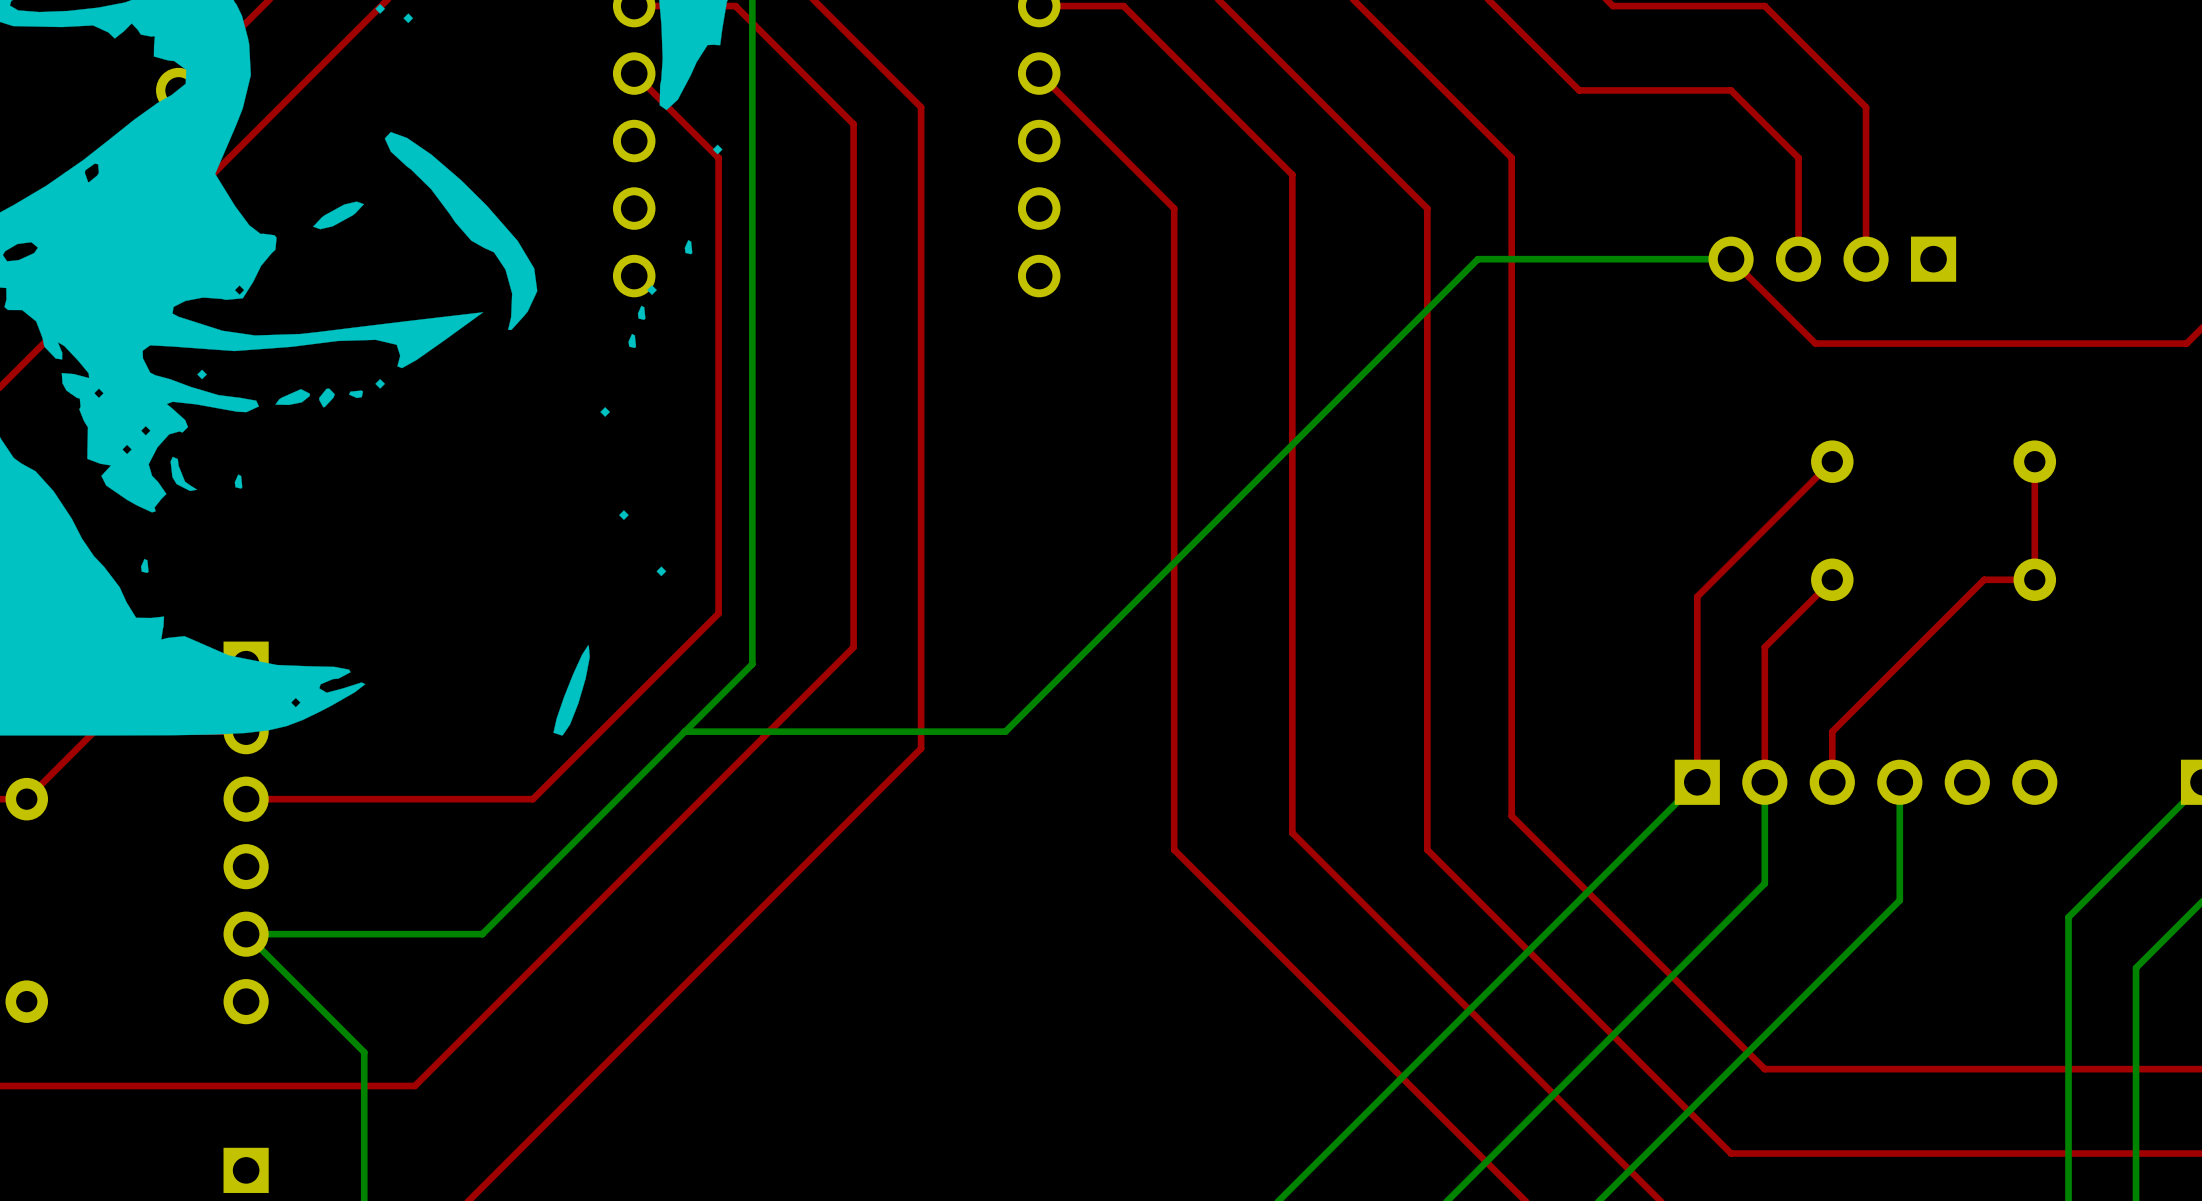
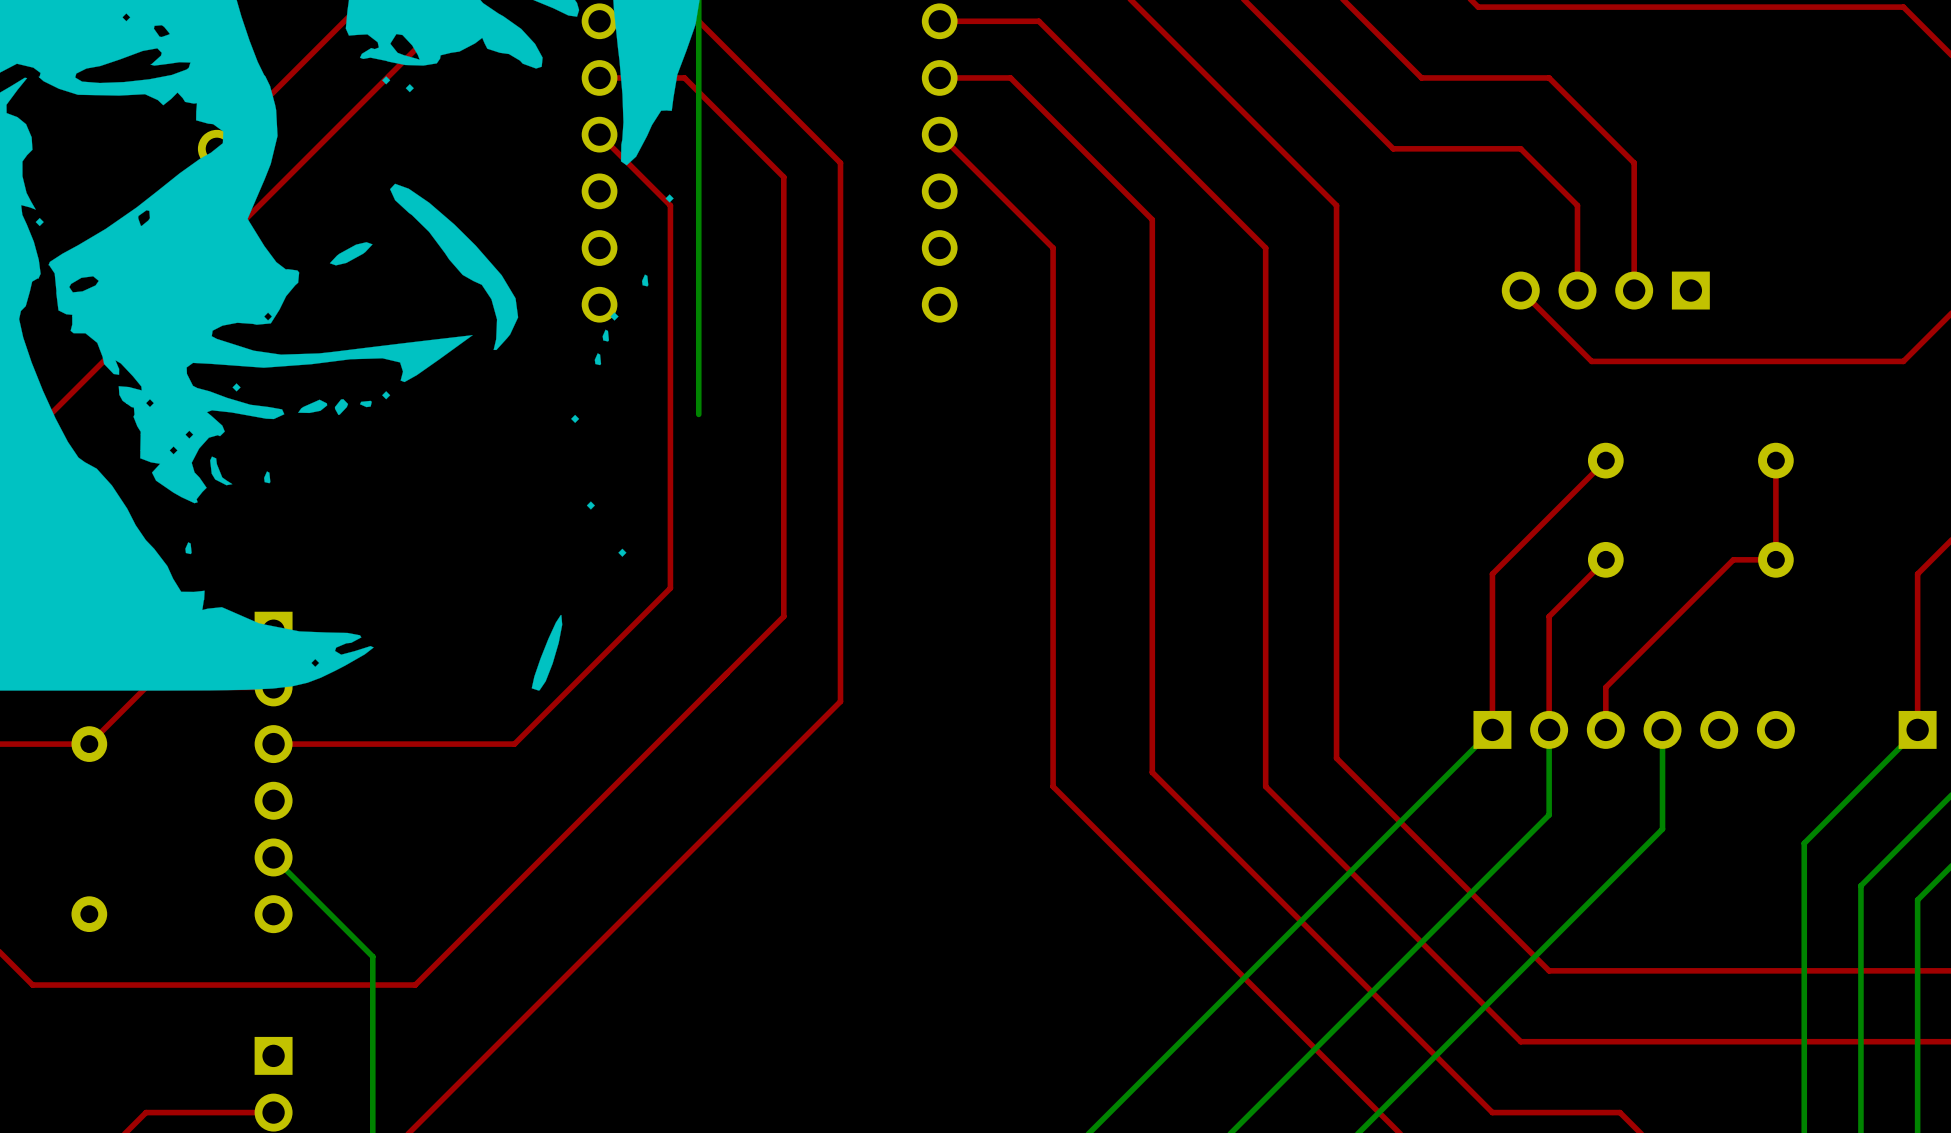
bottom track: (1731, 259) (1477, 259) (1005, 731) (684, 731) -> none
bottom track: (752, 406) (752, 664) (482, 934) (246, 934) -> none

